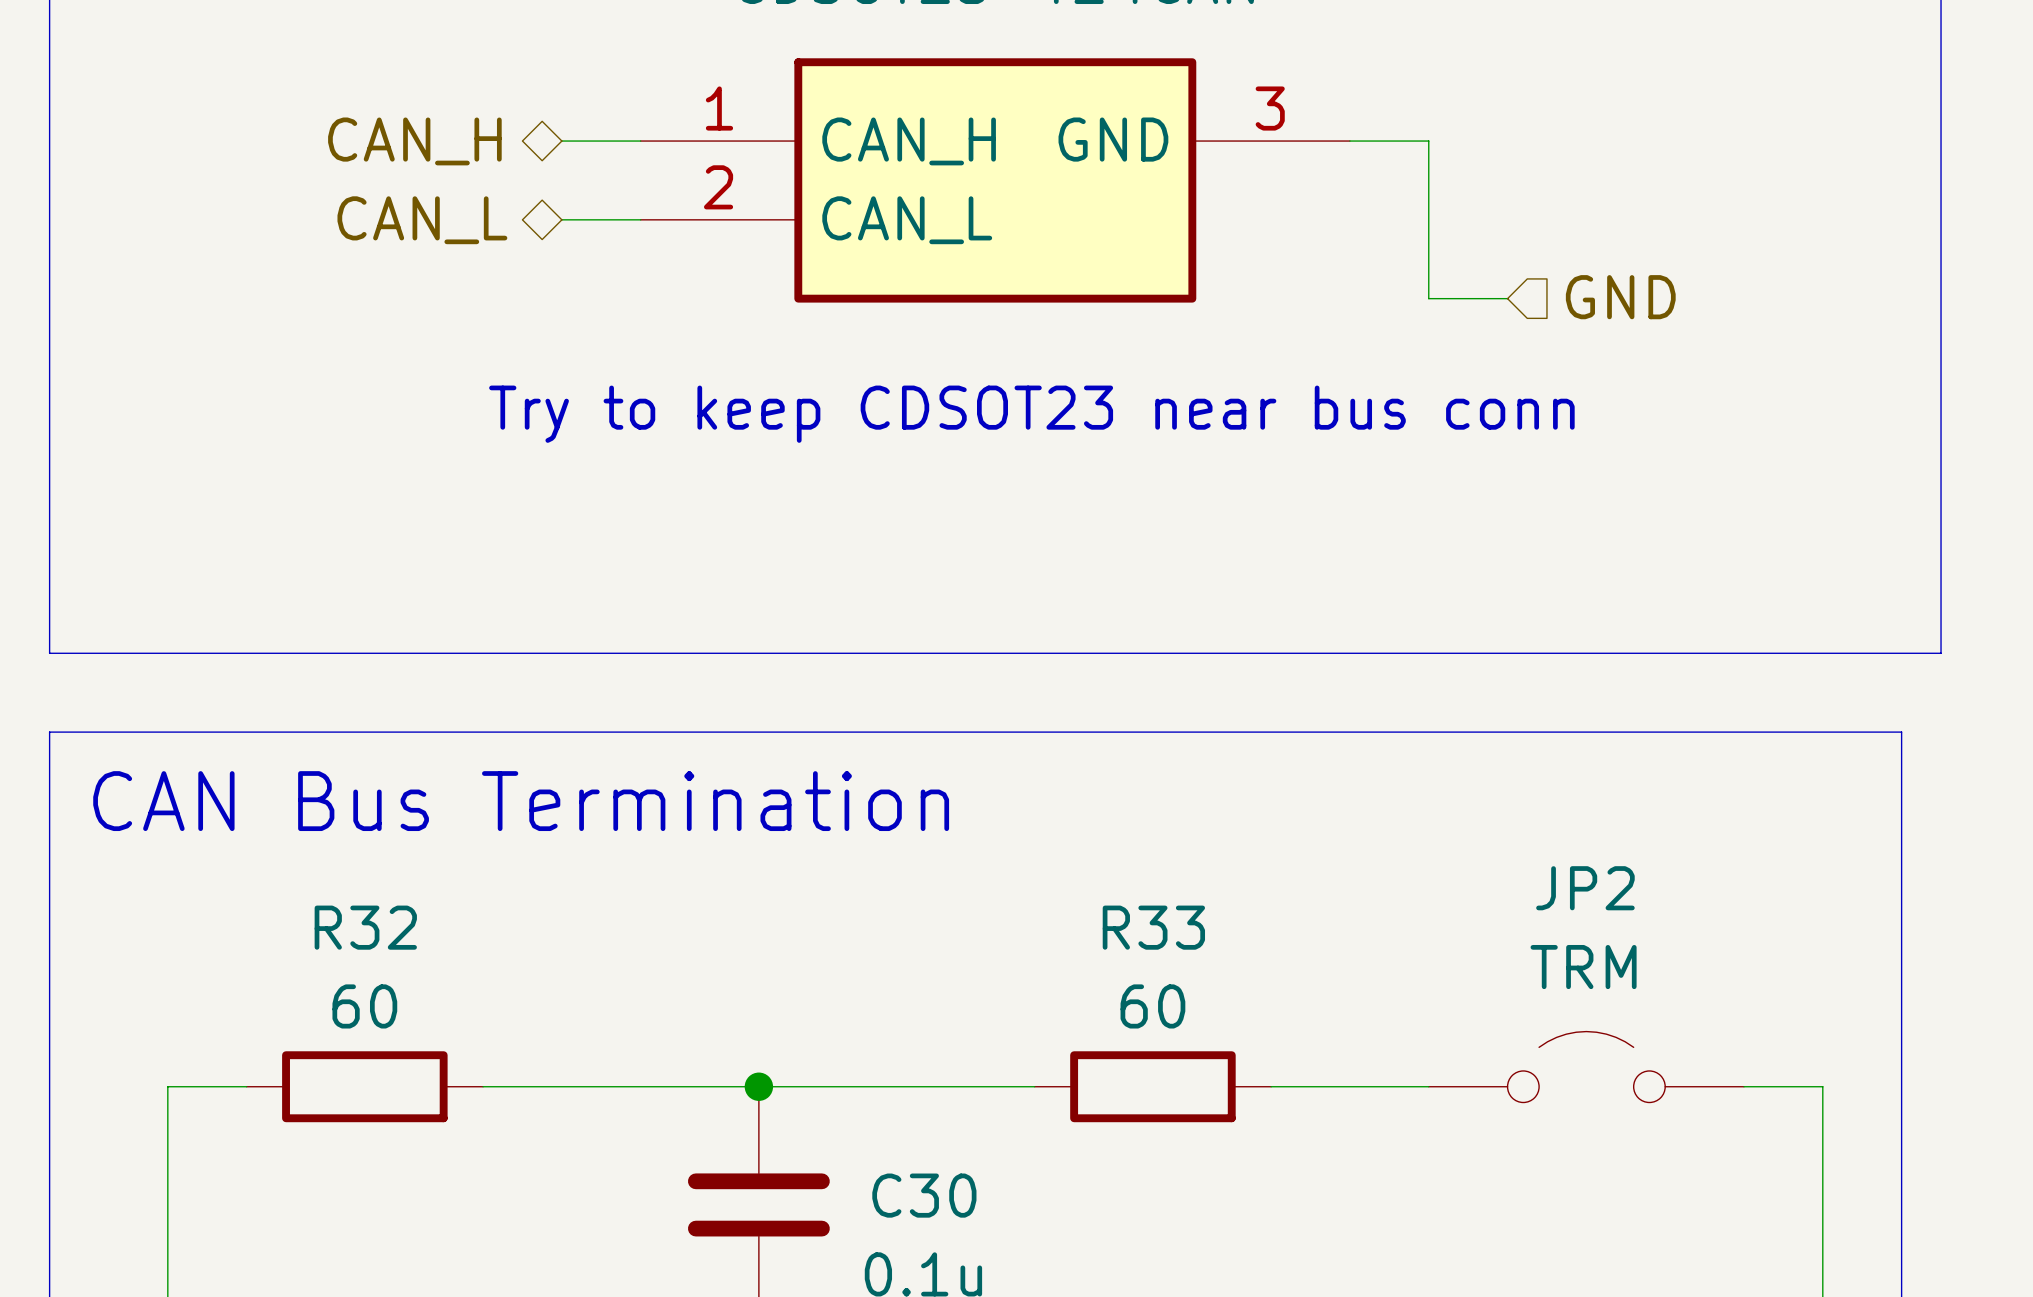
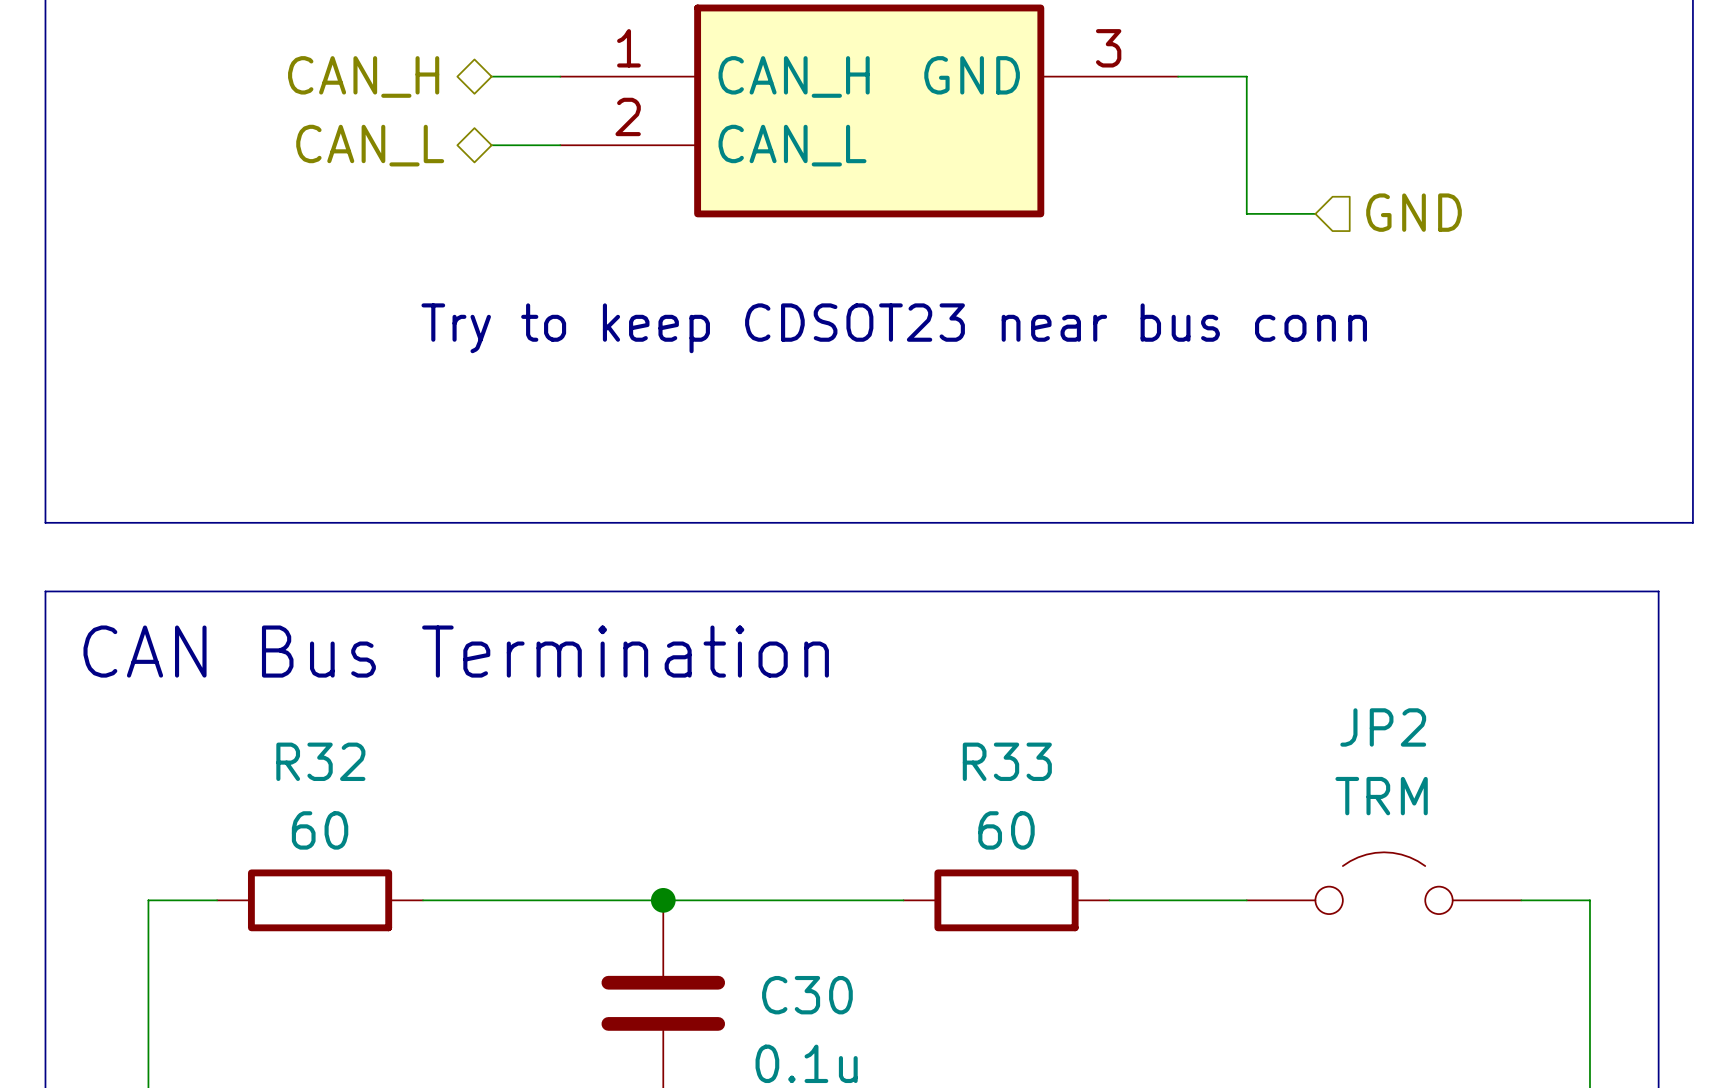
text position: Try to keep CDSOT23 near bus conn (1031, 414) -> Try to keep CDSOT23 near bus conn (894, 328)

